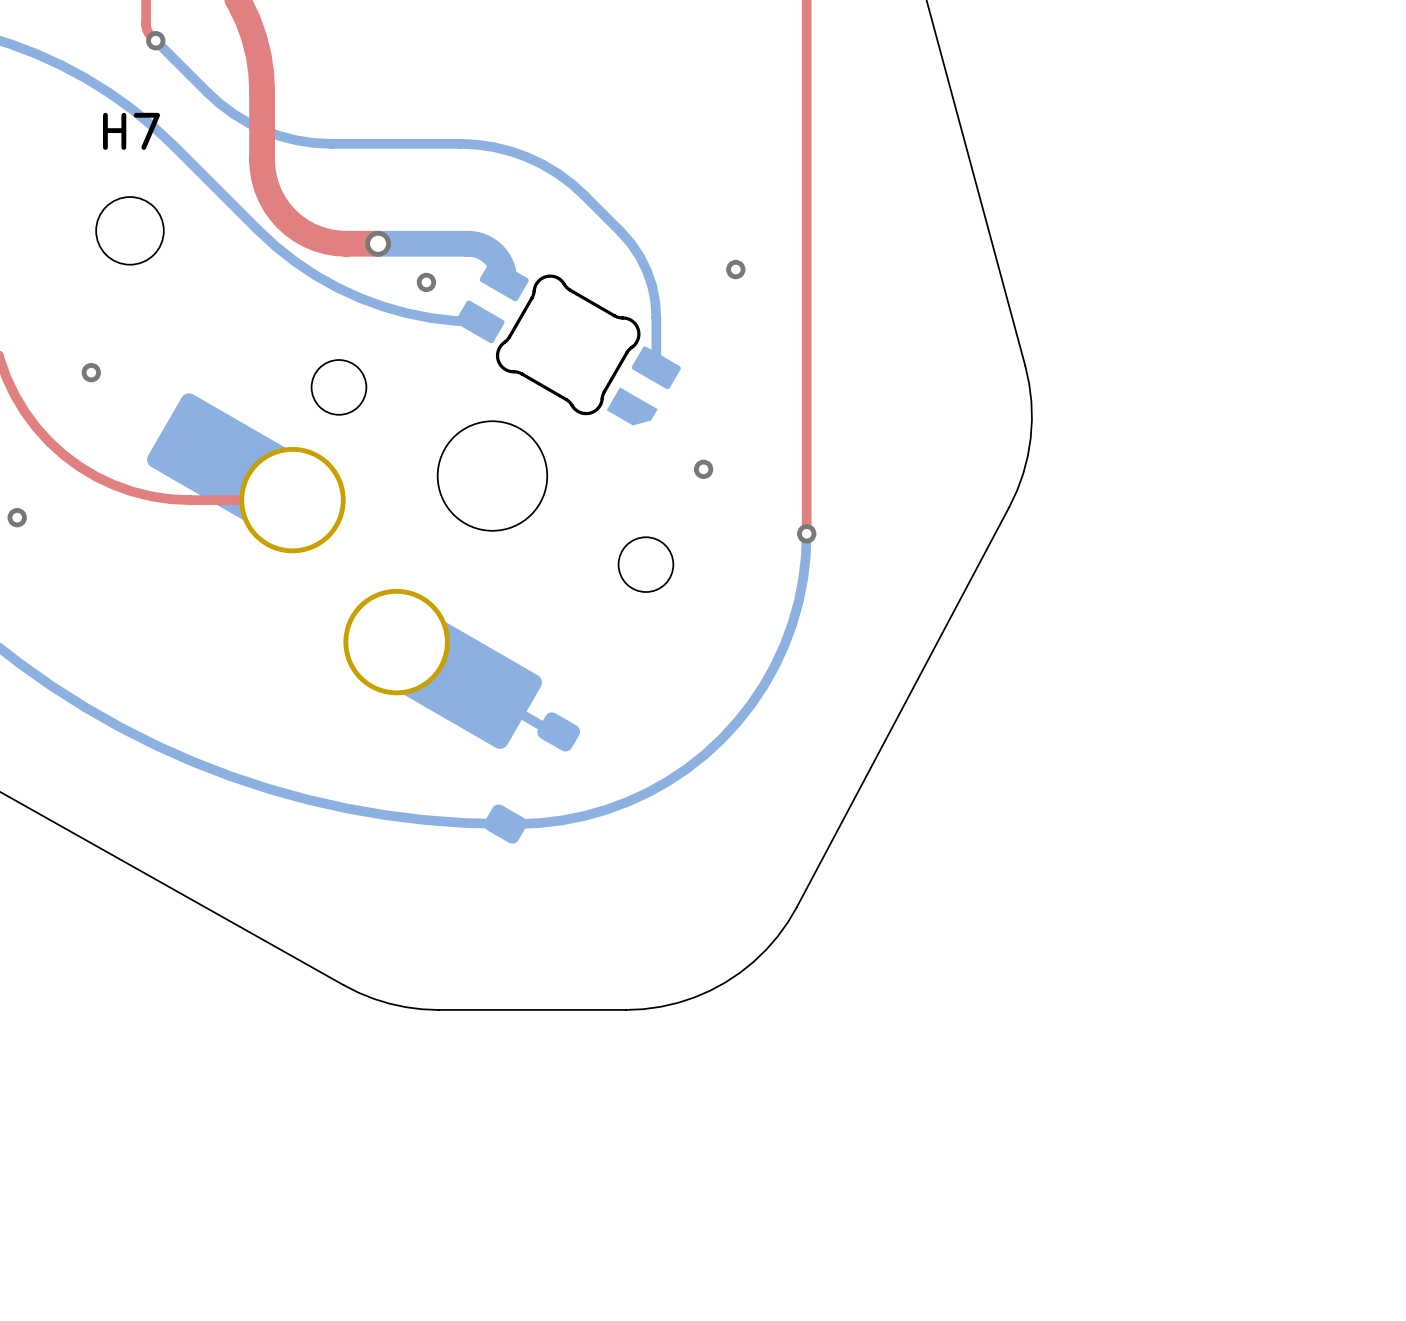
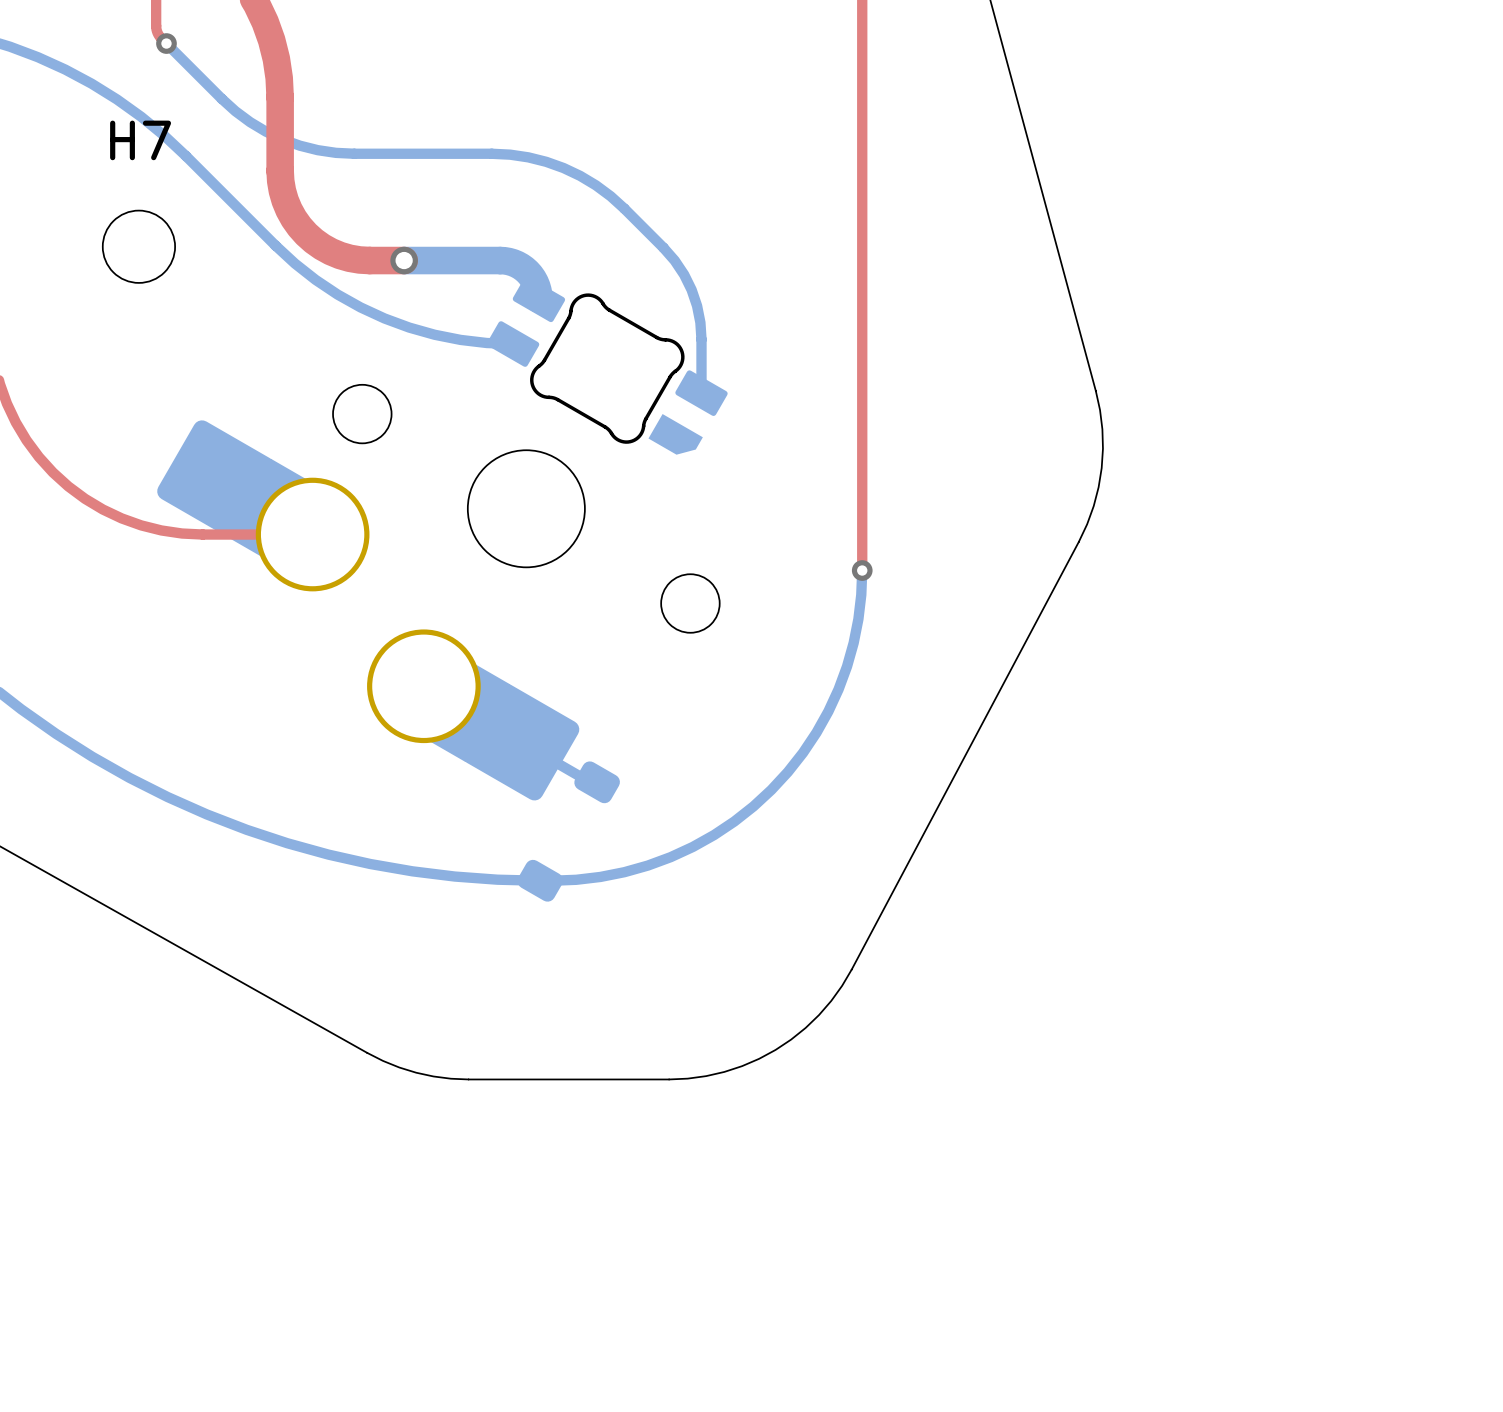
via: (735, 269) -> none
via: (426, 282) -> none
via: (91, 372) -> none
via: (703, 469) -> none
via: (17, 517) -> none

